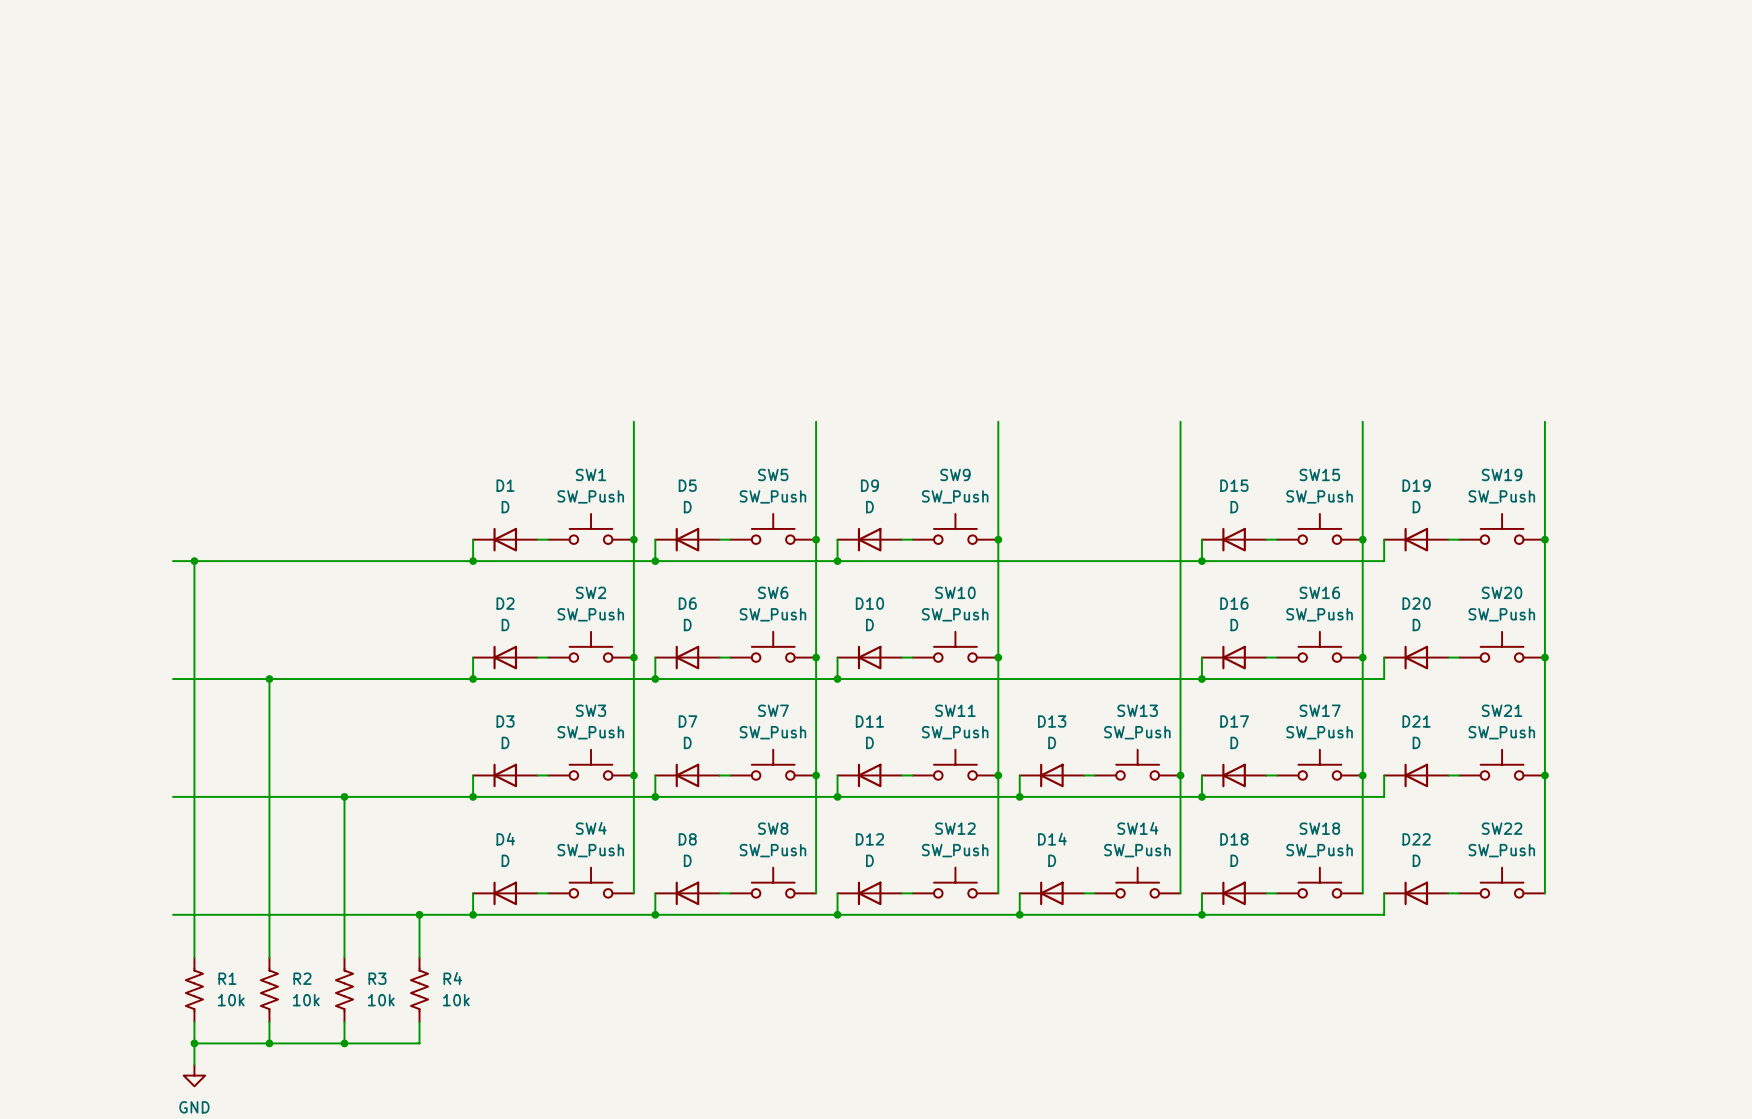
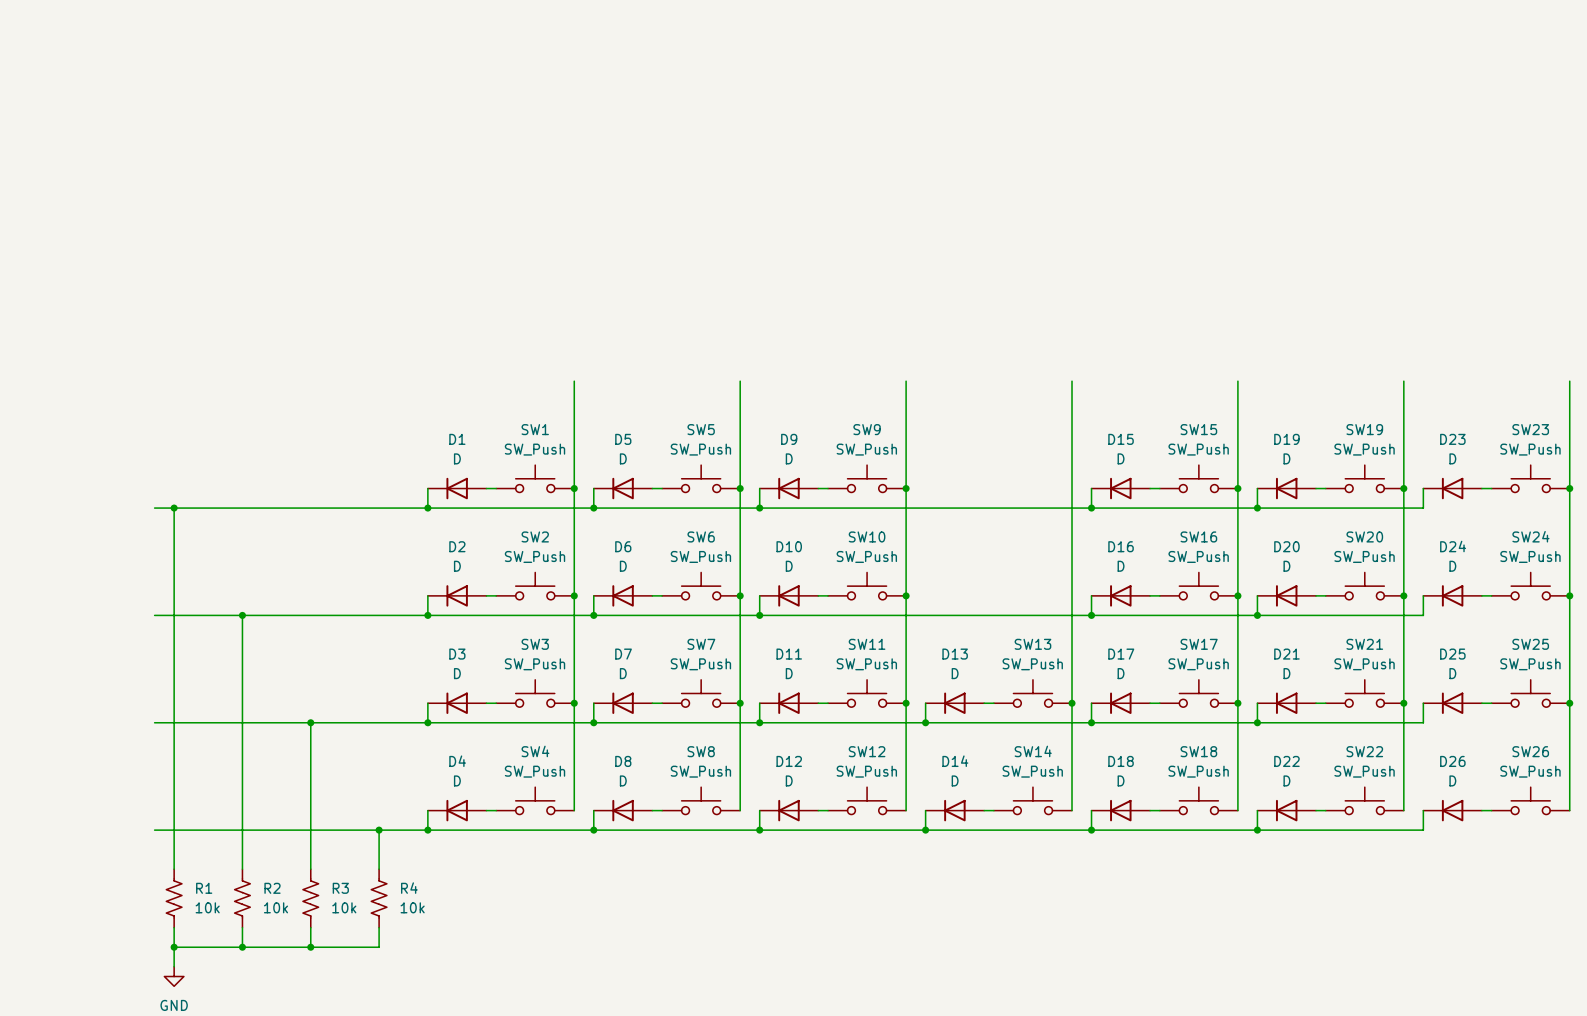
wire: none -> (1569, 381) (1569, 810)
SW23: none -> SW_Push (1530, 478)
wire: none -> (1423, 488) (1423, 508) (1257, 508)
D23: none -> D (1452, 488)
wire: none -> (1481, 488) (1491, 488)
junction: none -> (1569, 488)
junction: none -> (1257, 508)
SW24: none -> SW_Push (1530, 586)
wire: none -> (1423, 595) (1423, 615) (1257, 615)
D24: none -> D (1452, 595)
wire: none -> (1481, 595) (1491, 595)
junction: none -> (1569, 595)
junction: none -> (1257, 615)
SW25: none -> SW_Push (1530, 693)
wire: none -> (1423, 703) (1423, 722) (1257, 722)
D25: none -> D (1452, 703)
wire: none -> (1481, 703) (1491, 703)
junction: none -> (1569, 703)
junction: none -> (1257, 722)
SW26: none -> SW_Push (1530, 800)
wire: none -> (1423, 810) (1423, 830) (1257, 830)
D26: none -> D (1452, 810)
wire: none -> (1481, 810) (1491, 810)
junction: none -> (1257, 830)

